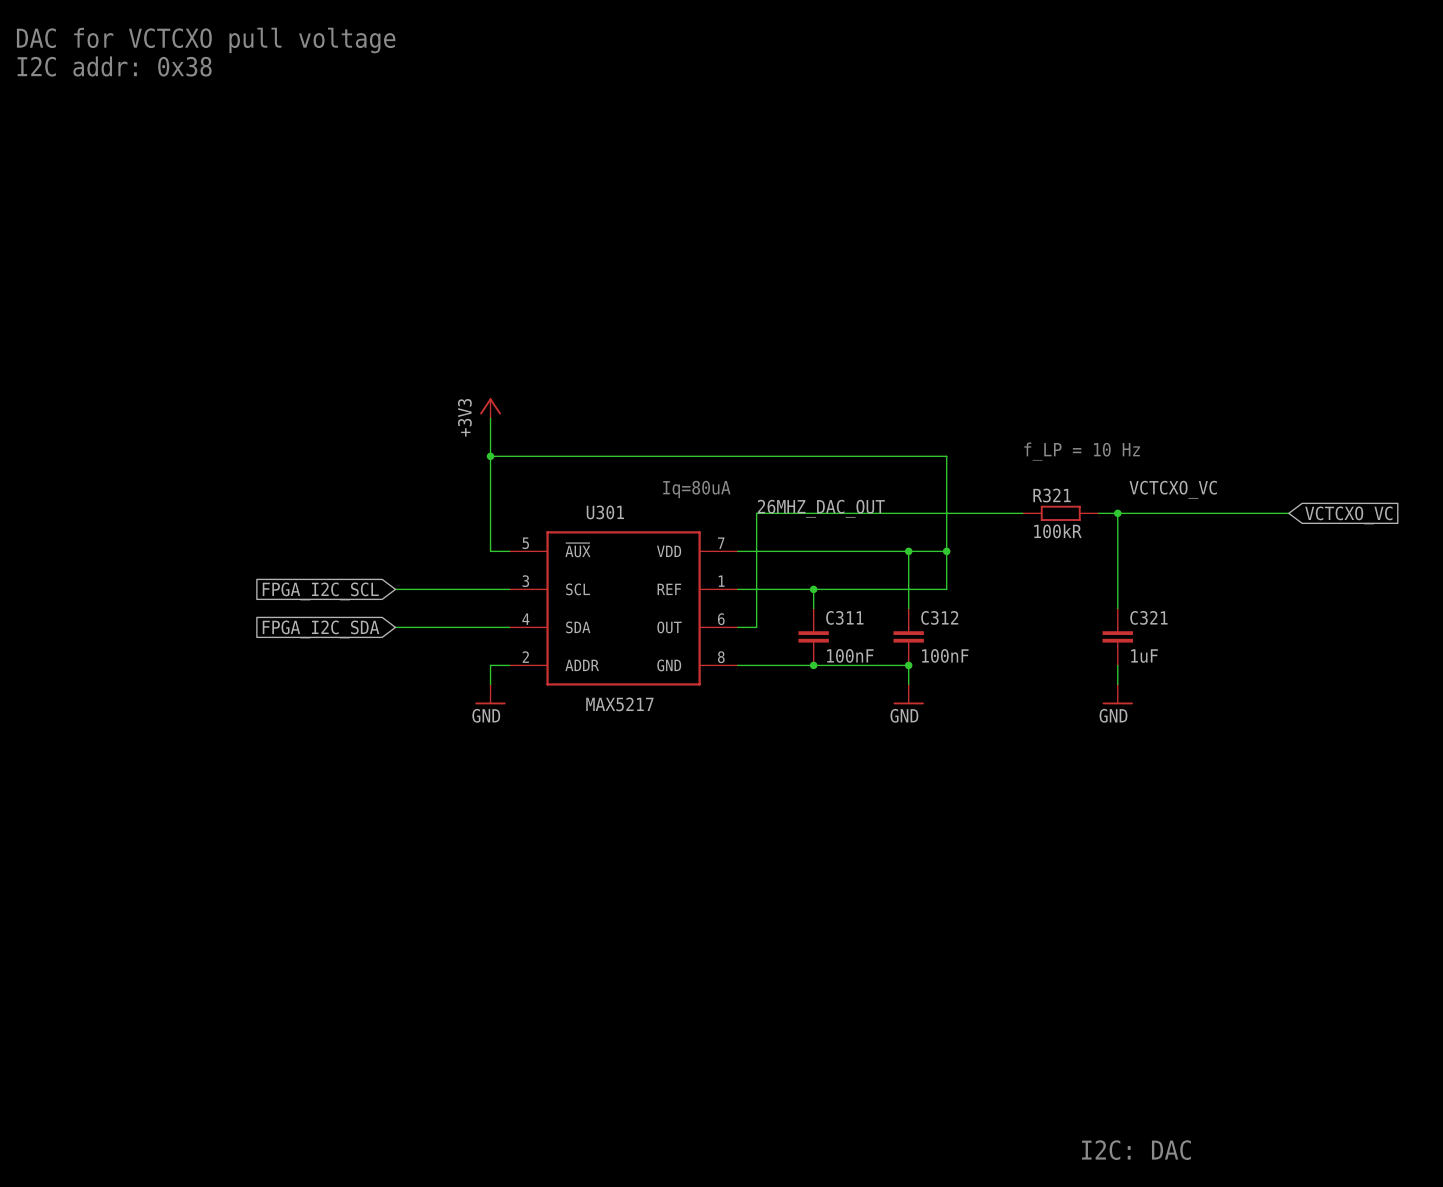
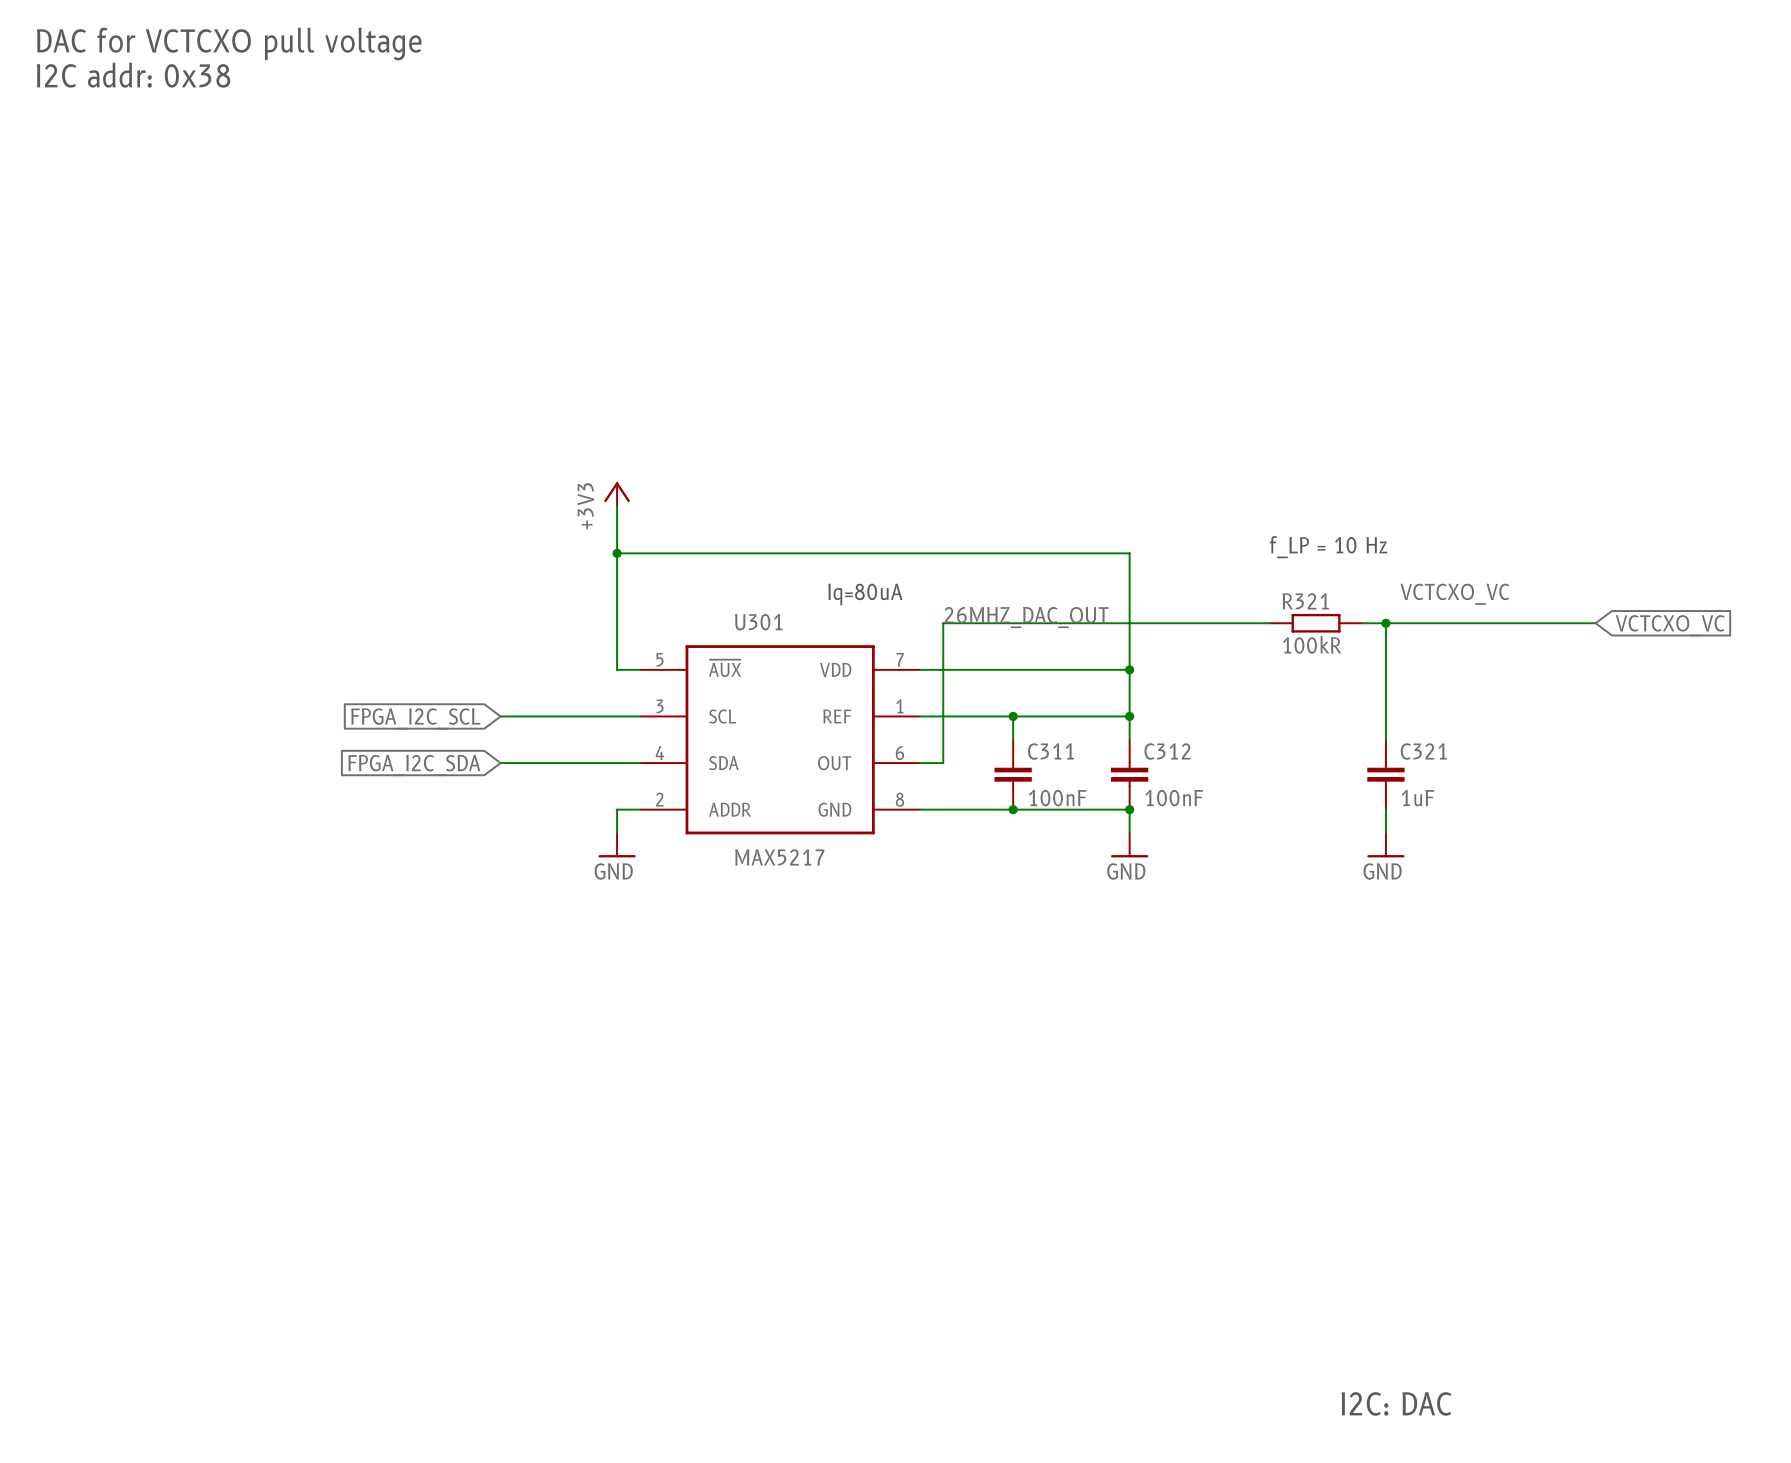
wire: (908, 456) (946, 456) (946, 589) (908, 589) -> (1129, 553) (1129, 669)
wire: (908, 551) (946, 551) -> none
junction: (946, 551) -> none
junction: none -> (1129, 716)

